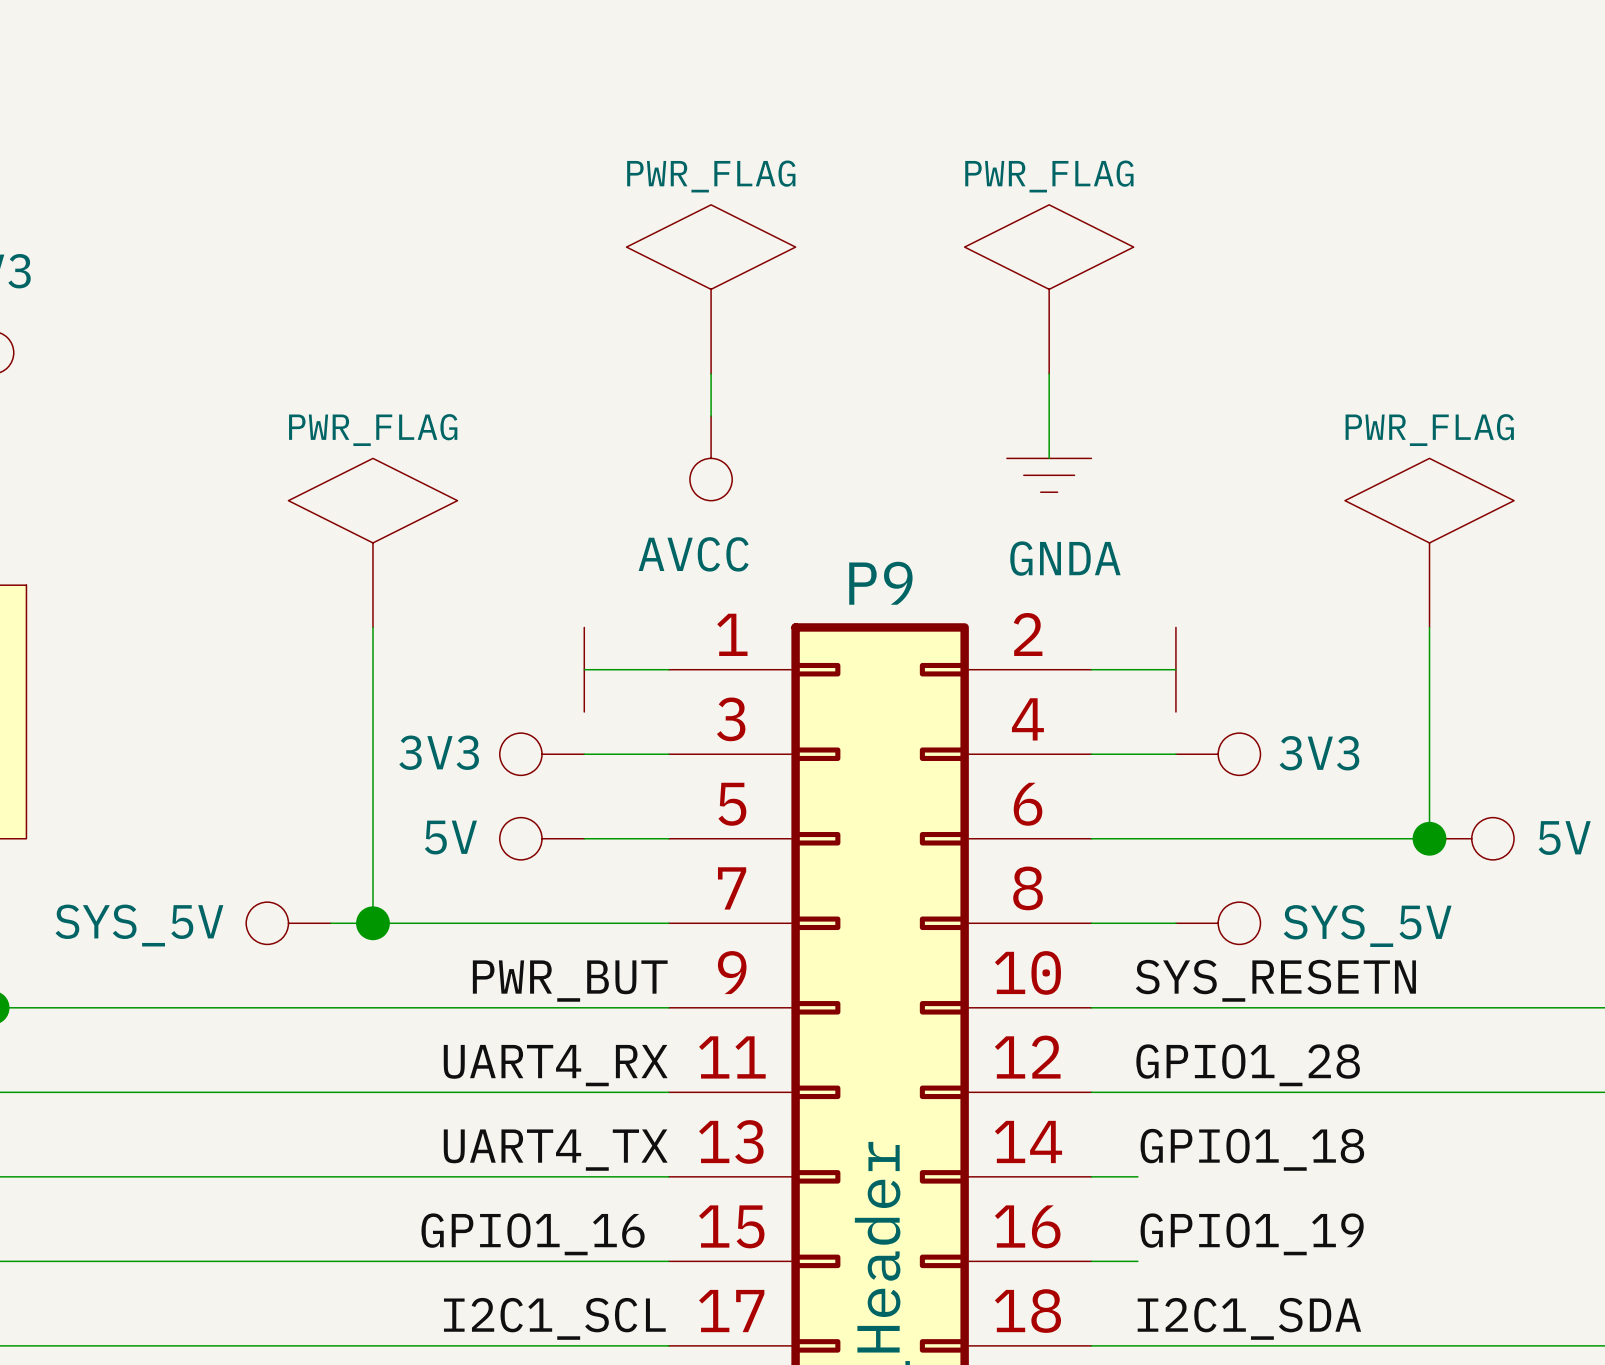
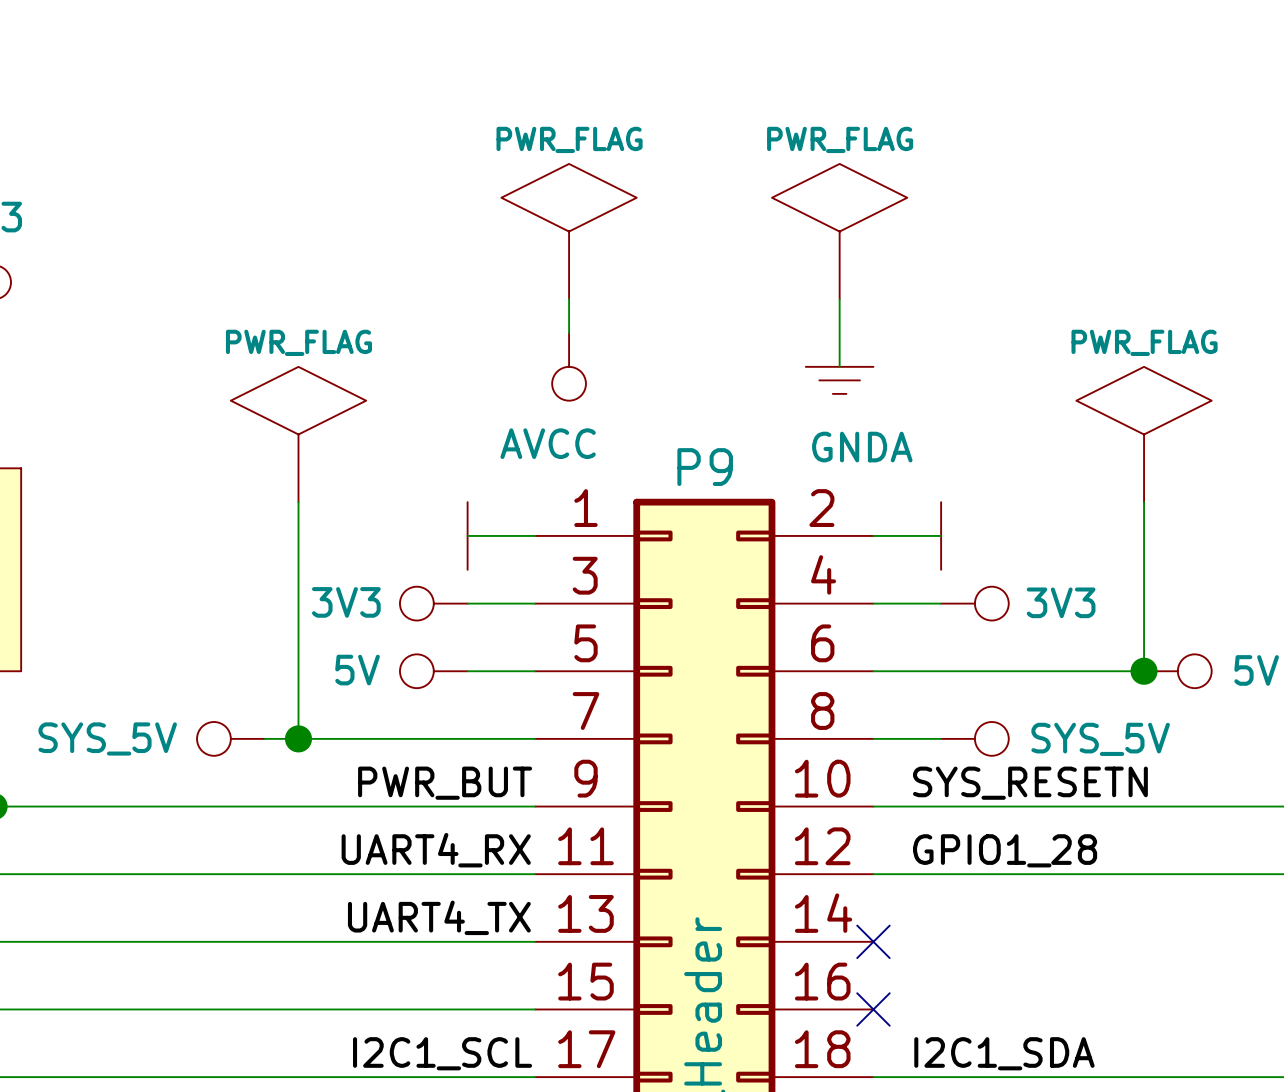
label: GPIO1_18 (1252, 1149) -> none
wire: (1091, 1176) (1137, 1176) -> none
no-connect mark: none -> (873, 941)
label: GPIO1_16 (533, 1234) -> none
label: GPIO1_19 (1252, 1234) -> none
wire: (1091, 1261) (1137, 1261) -> none
no-connect mark: none -> (873, 1009)

